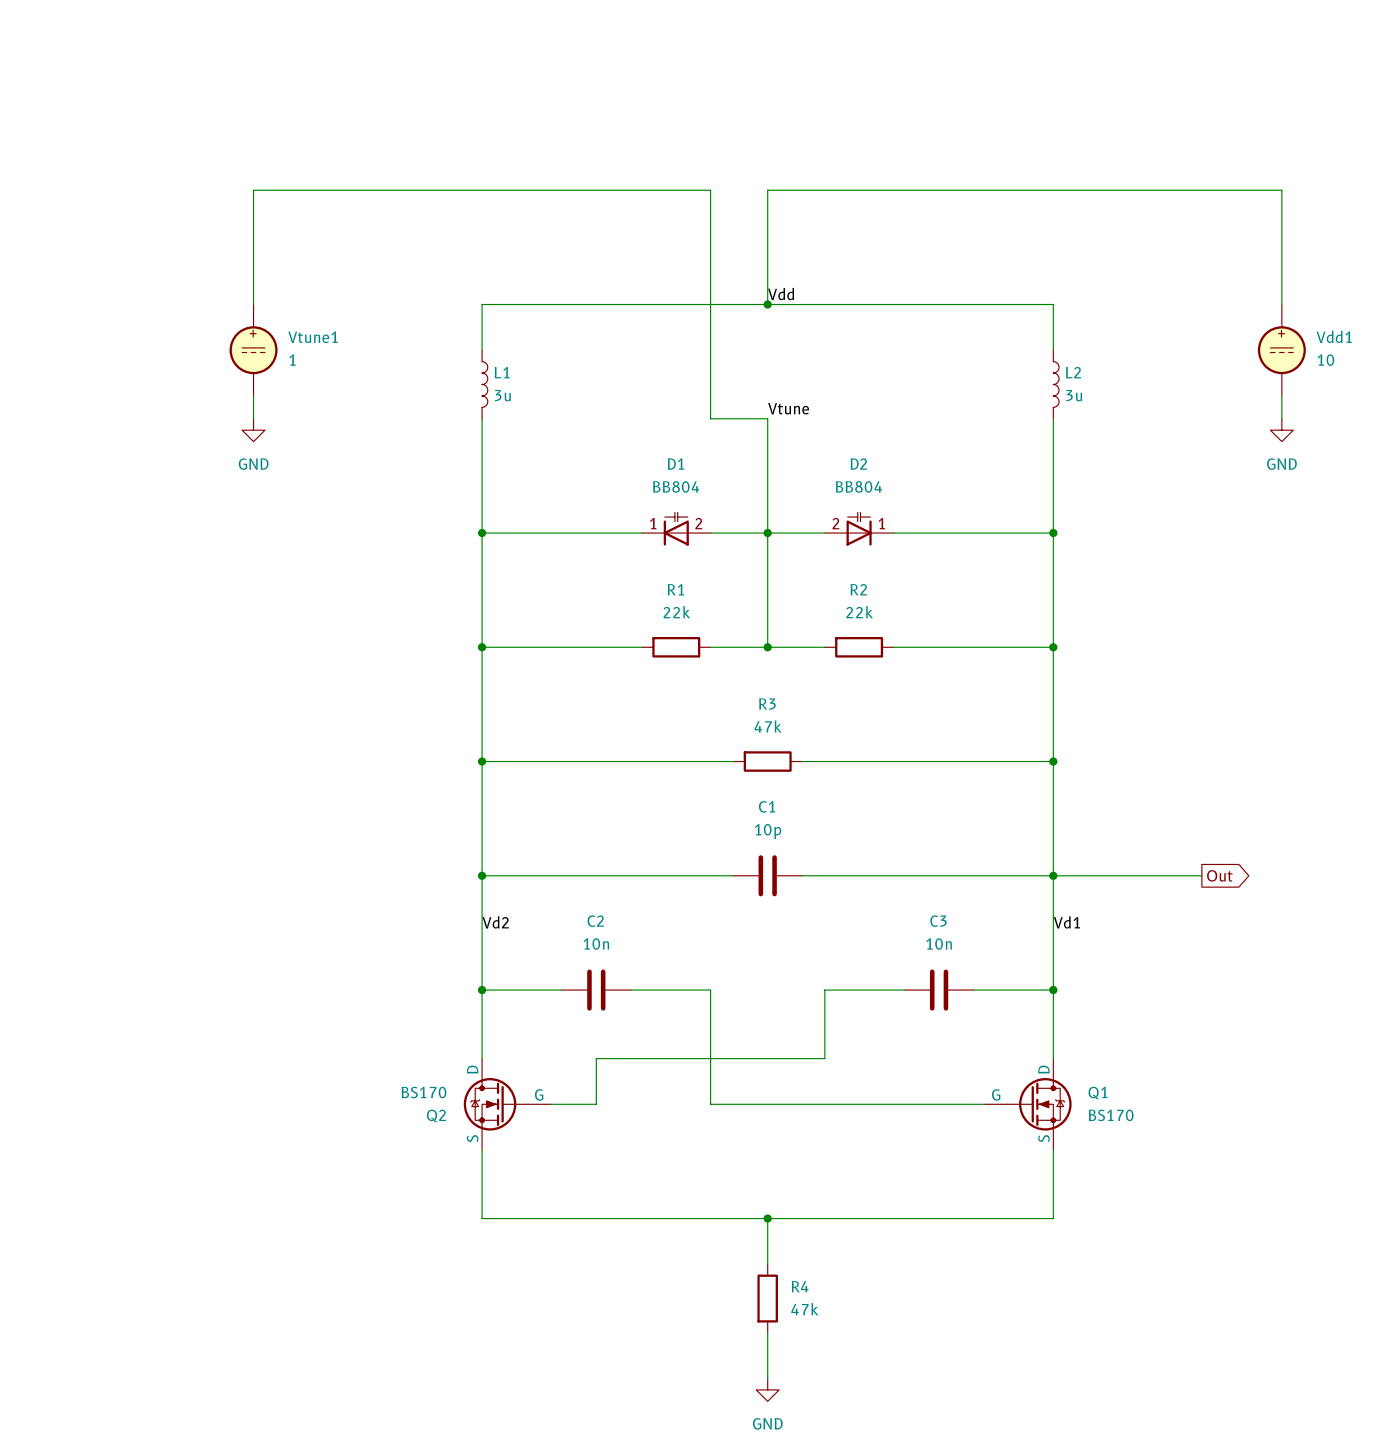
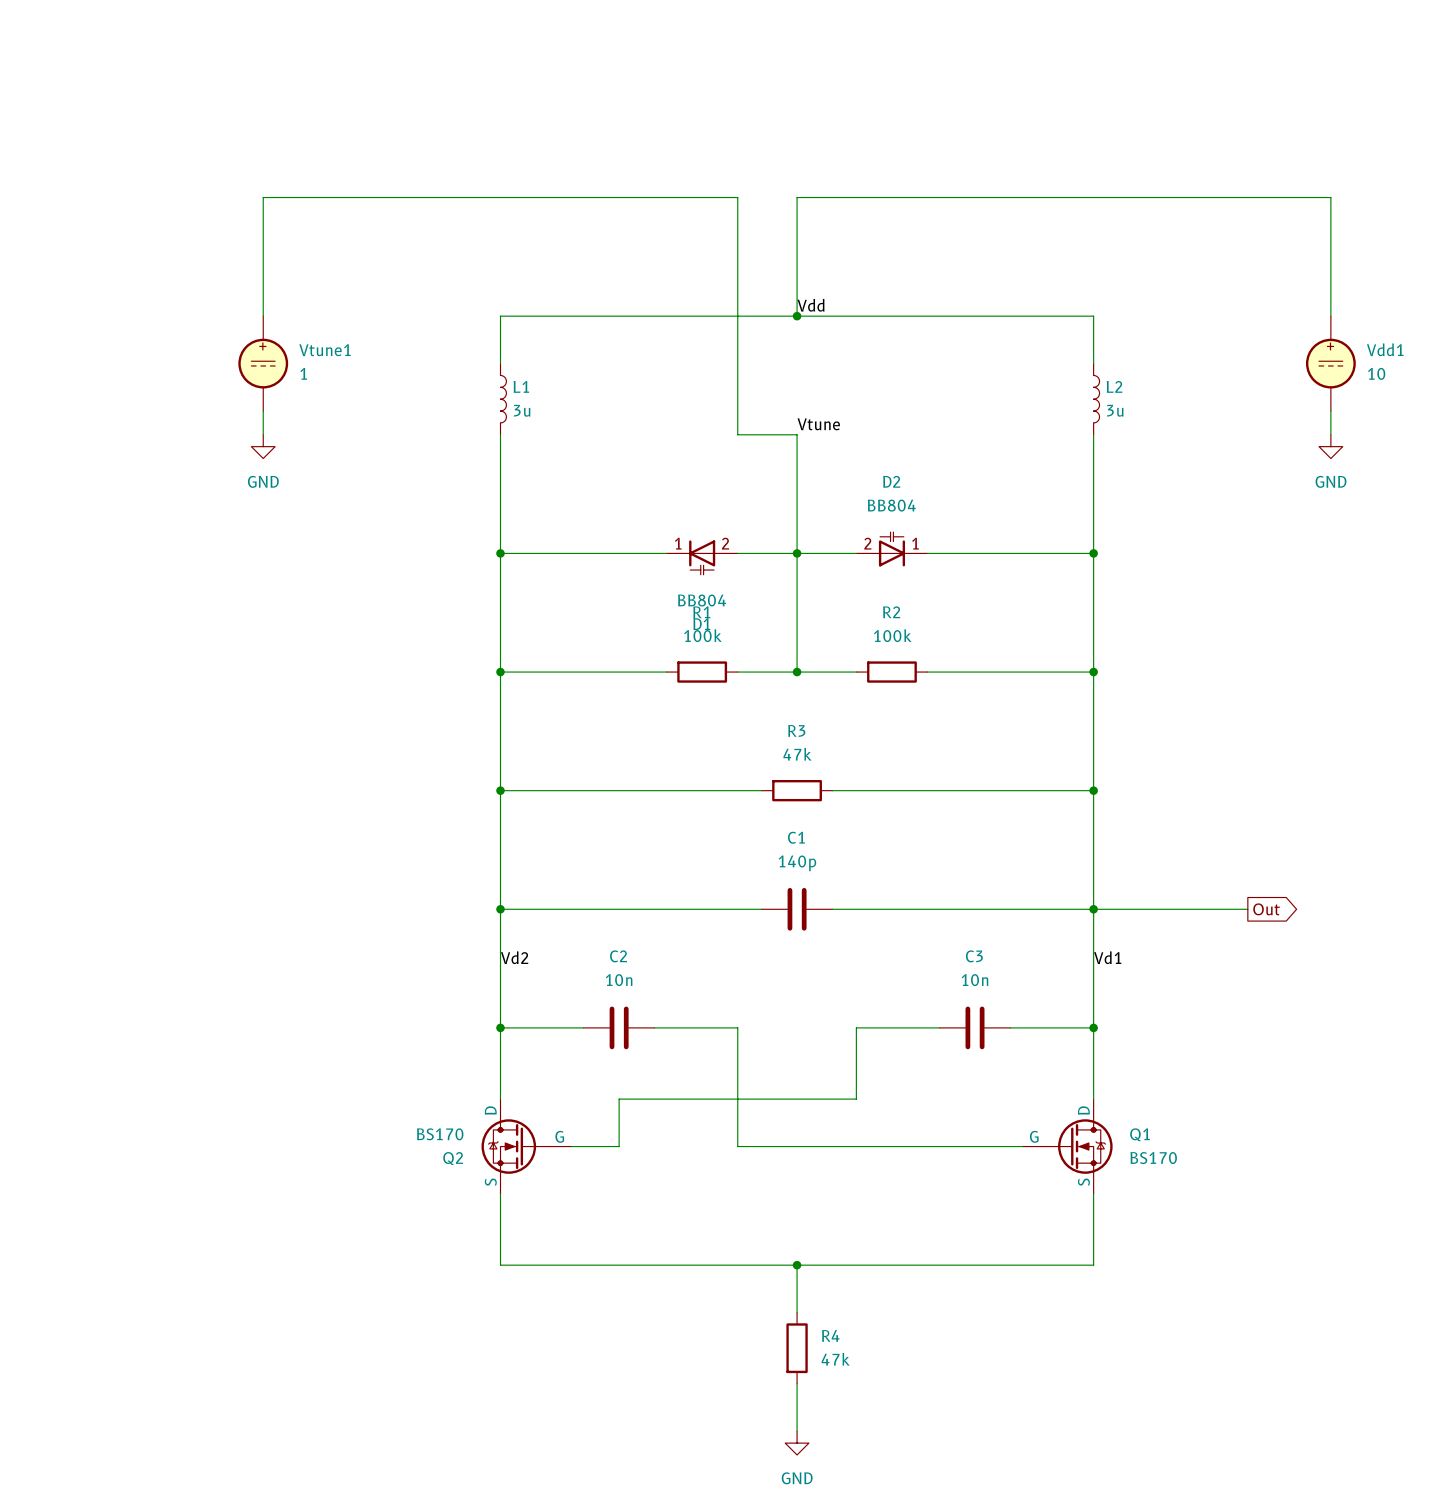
D1 flip: as is (676, 529) -> up-down (702, 557)
R1 value: 22k (676, 612) -> 100k (702, 635)
R2 value: 22k (859, 612) -> 100k (892, 635)
C1 value: 10p (768, 831) -> 140p (797, 863)

